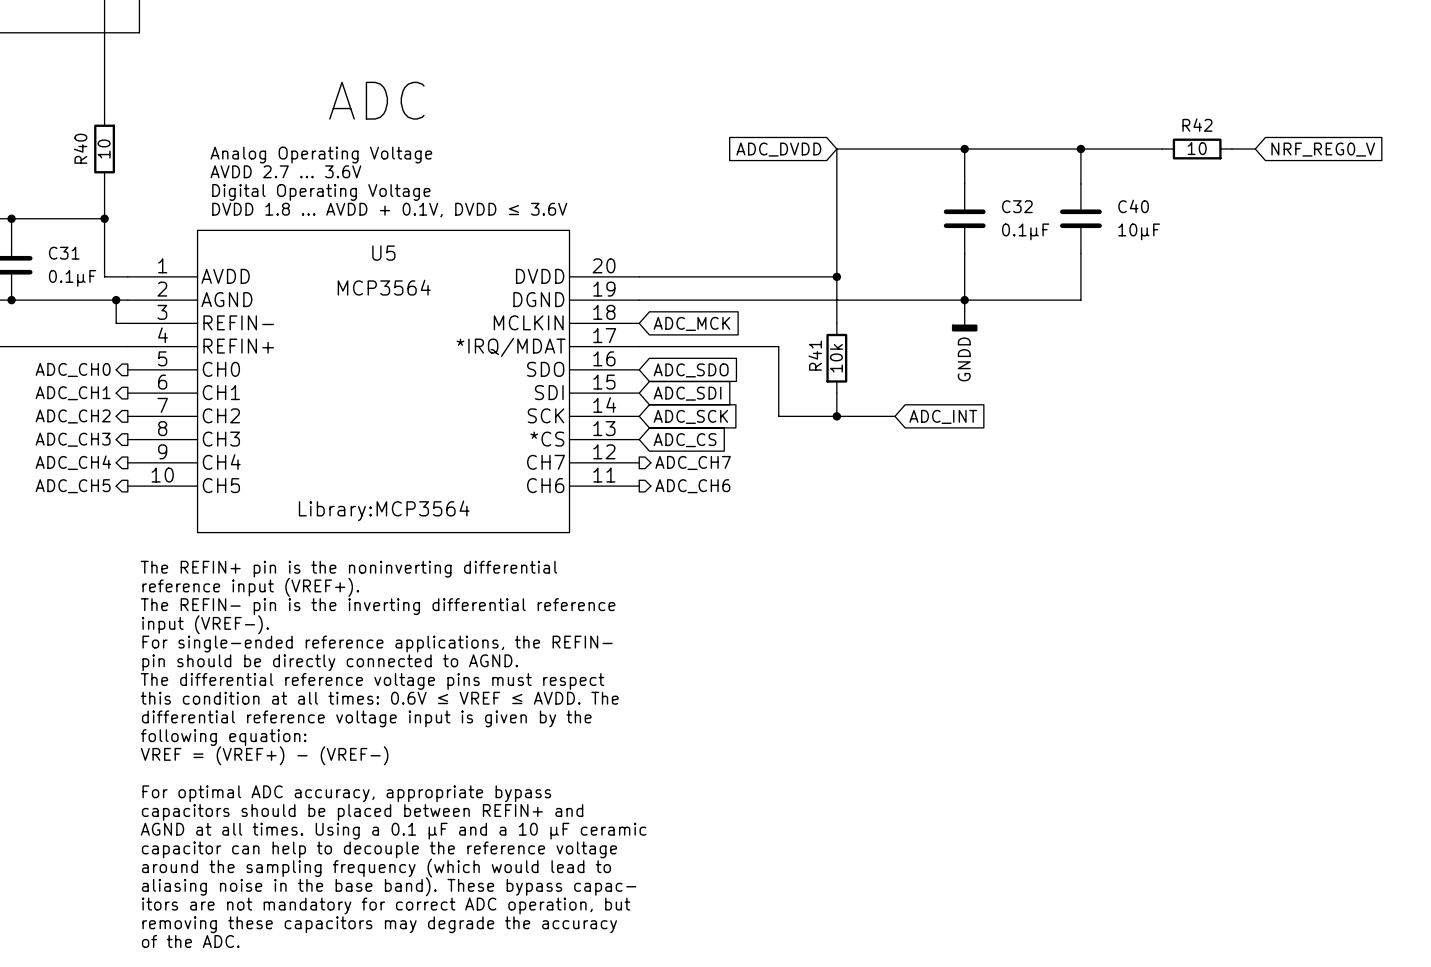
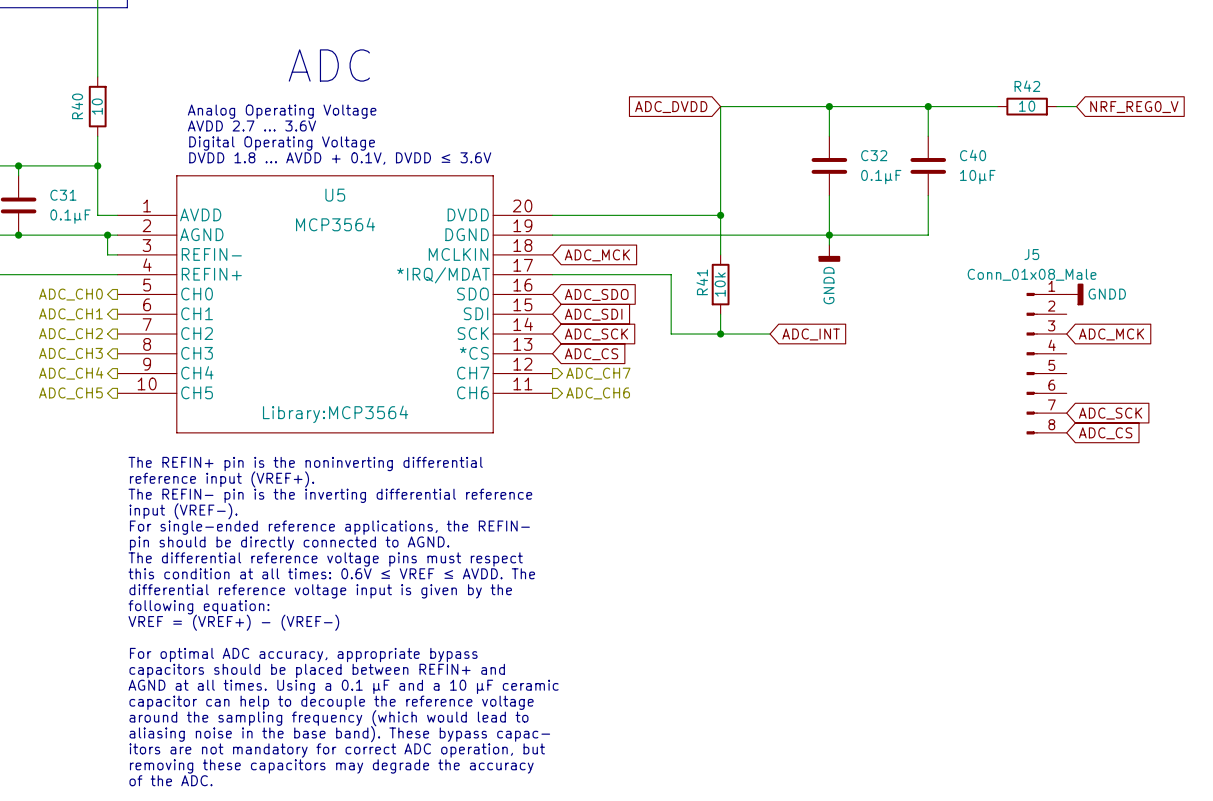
power symbol: none -> GNDD (1075, 294)
global label: none -> ADC_MCK (1111, 334)
J5: none -> Conn_01x08_Male (1046, 363)
global label: none -> ADC_SCK (1110, 413)
global label: none -> ADC_CS (1105, 433)

